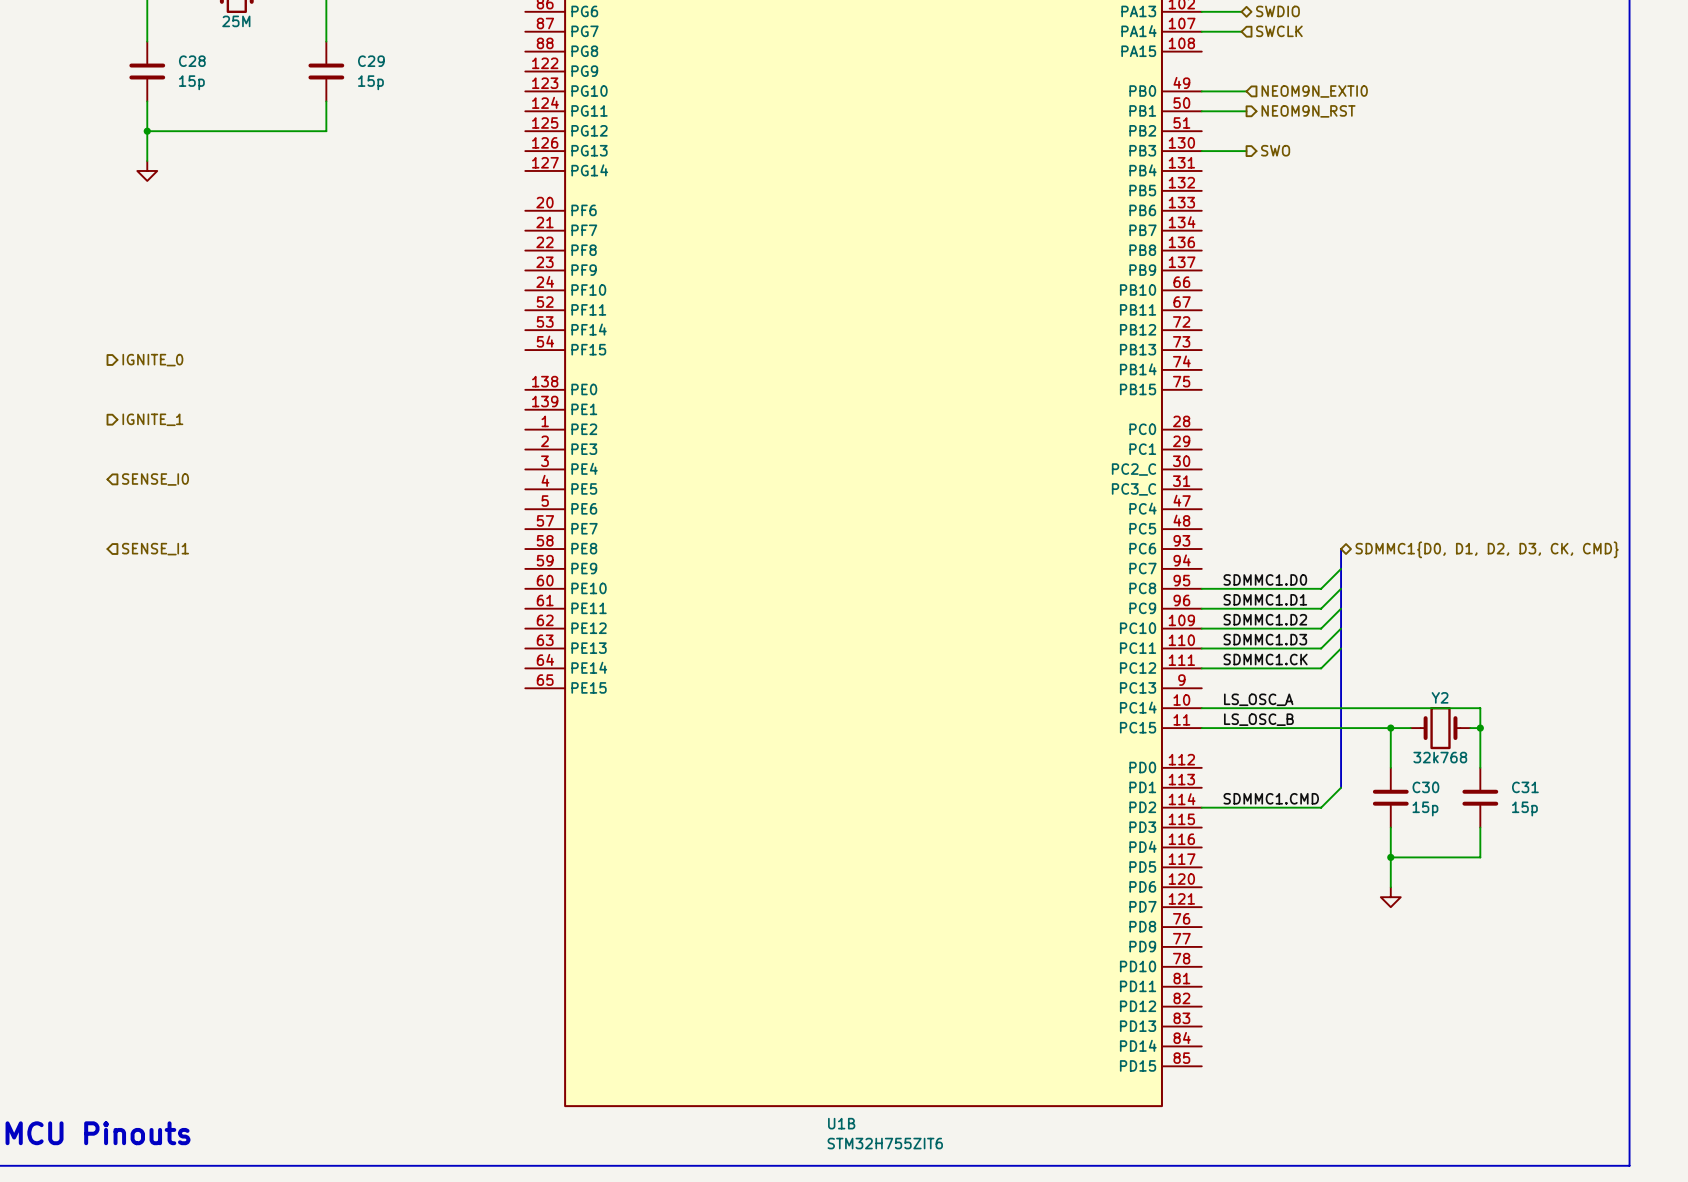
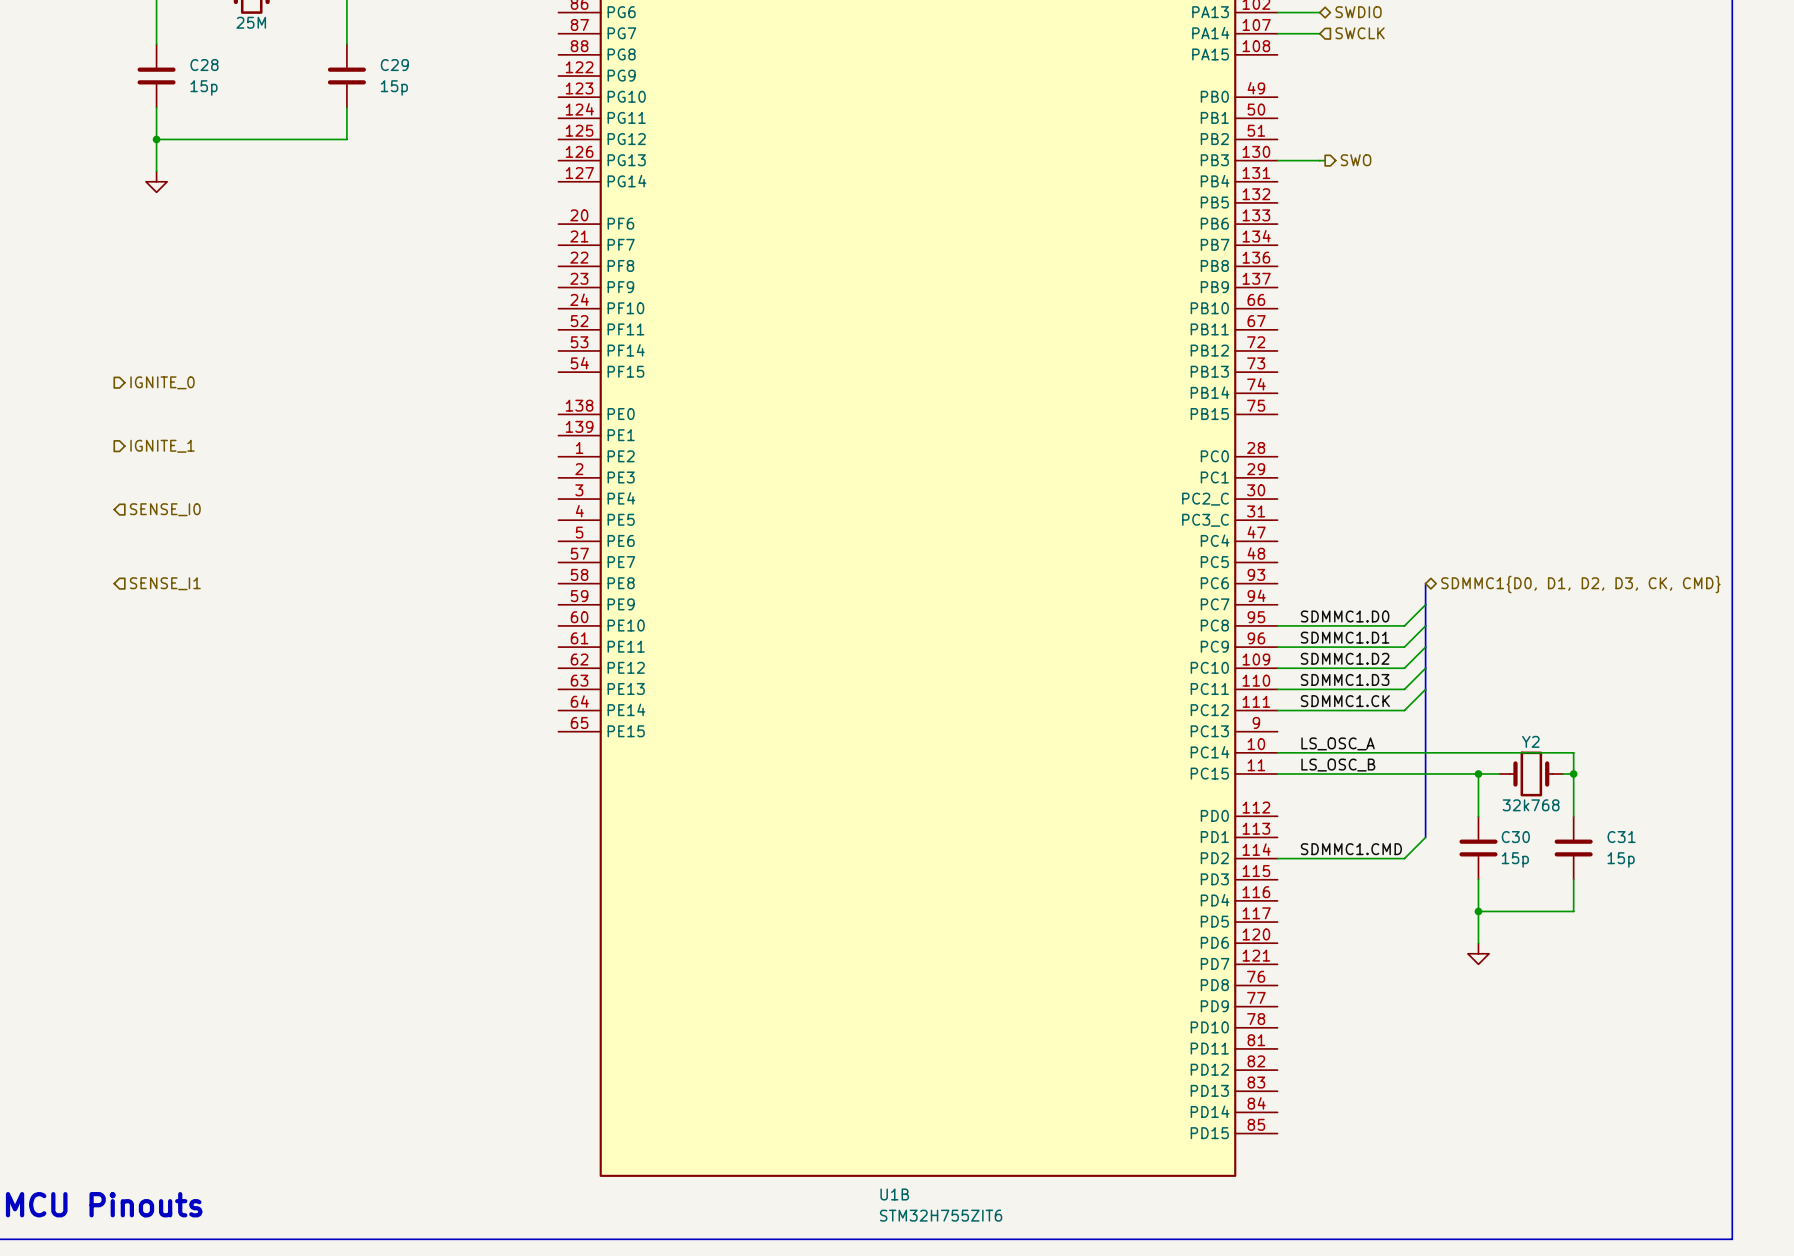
wire: (1201, 91) (1246, 91) -> none
hierarchical label: NEOM9N_EXTI0 (1314, 91) -> none
wire: (1201, 111) (1246, 111) -> none
hierarchical label: NEOM9N_RST (1308, 111) -> none

